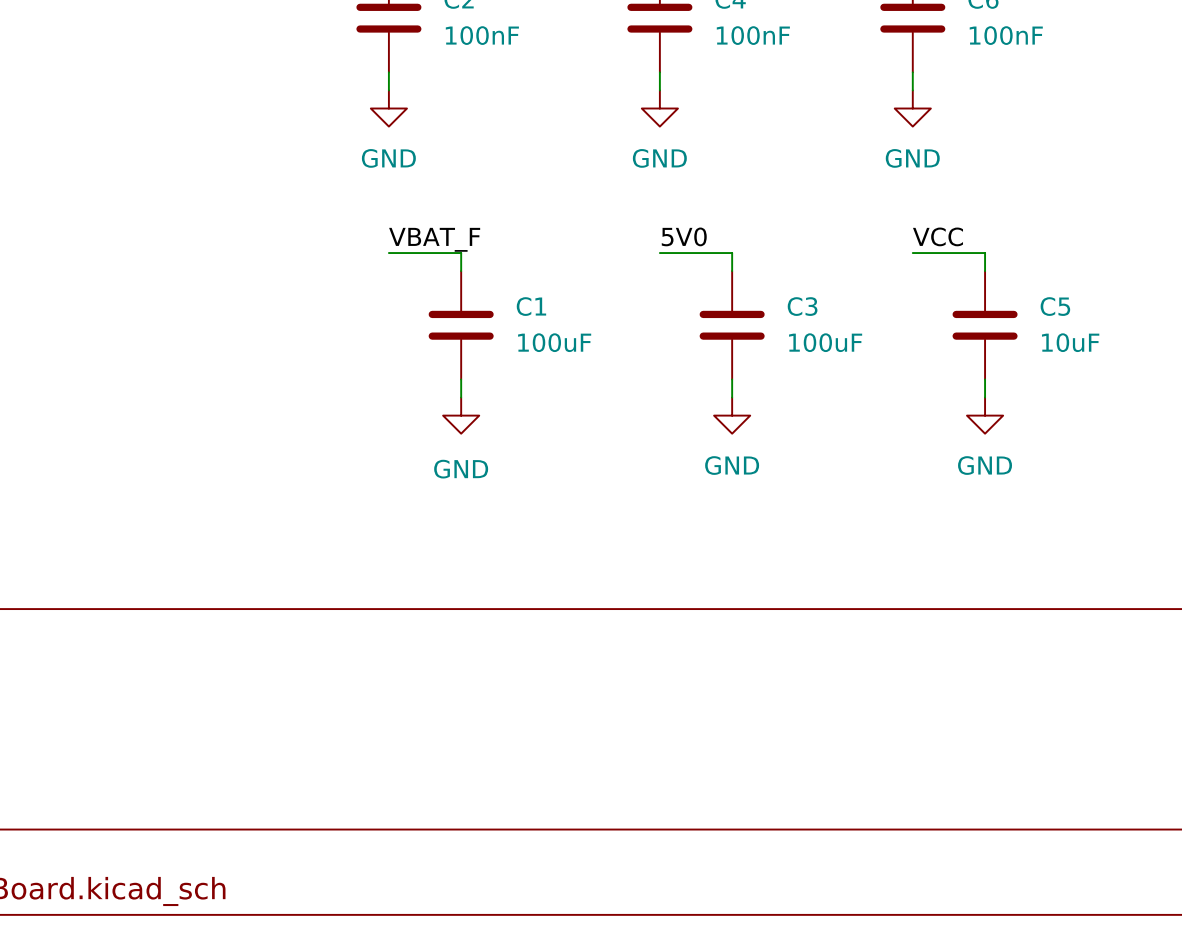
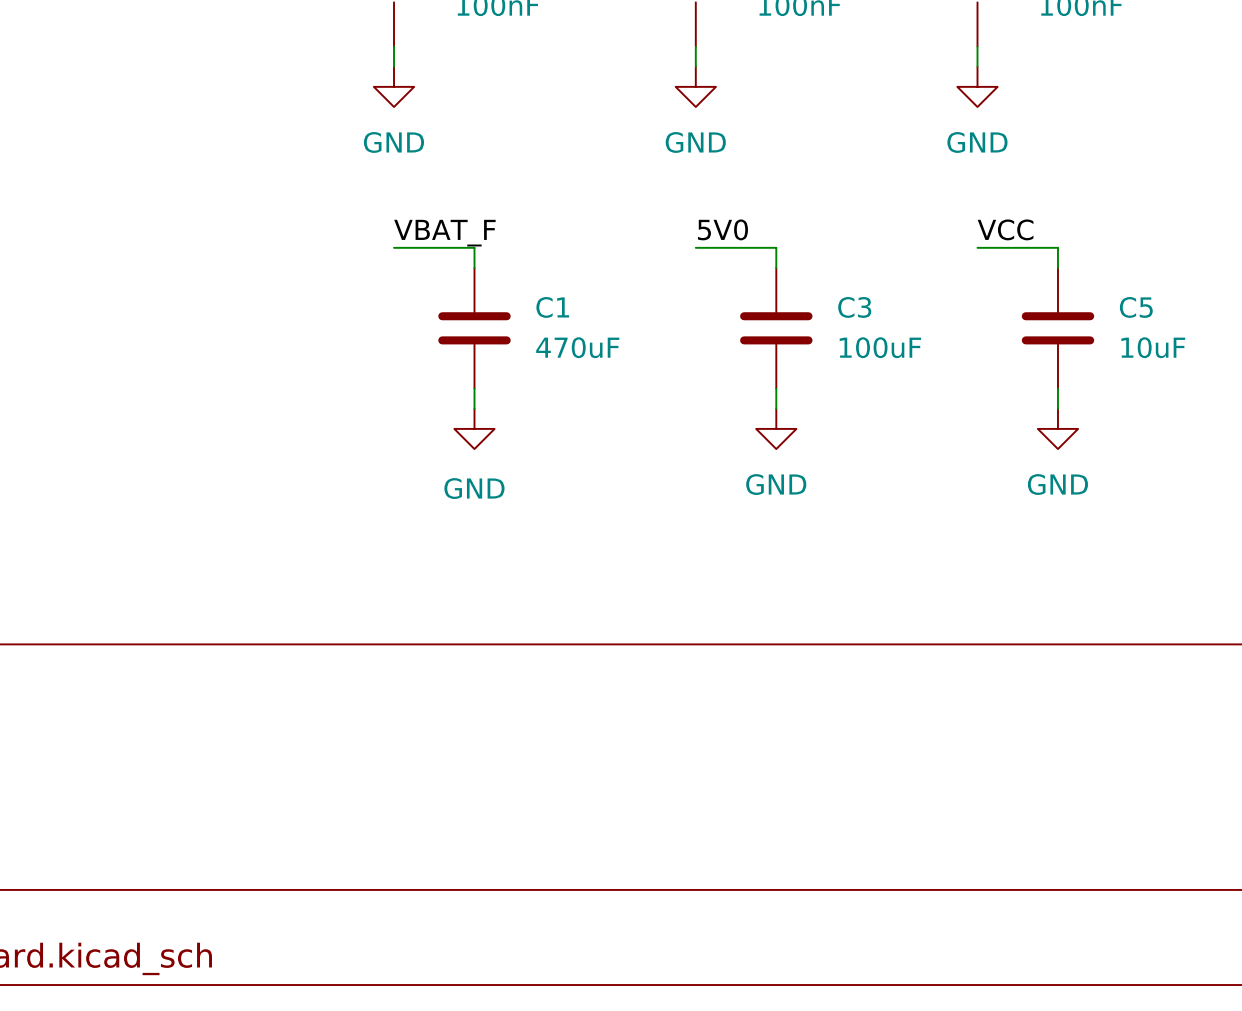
C1 value: 100uF (554, 342) -> 470uF (577, 347)

